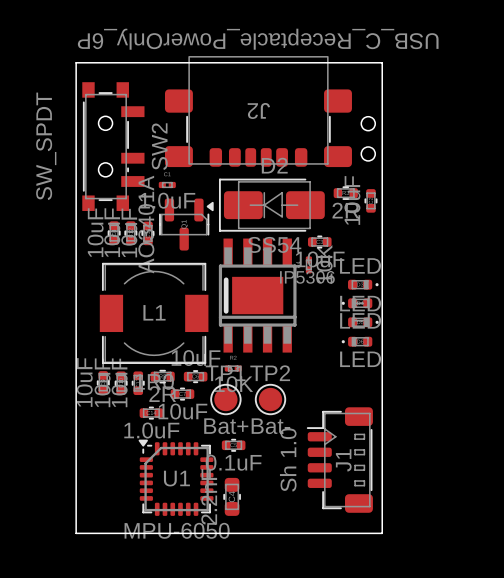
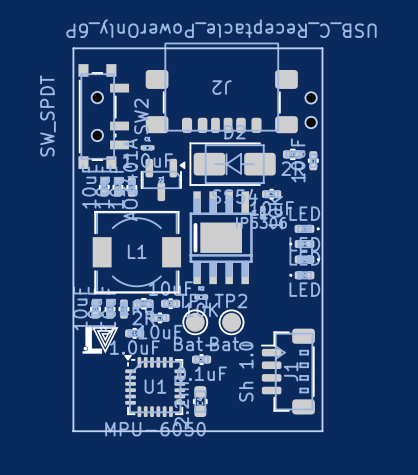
drawing: none -> [82, 327, 119, 354]

